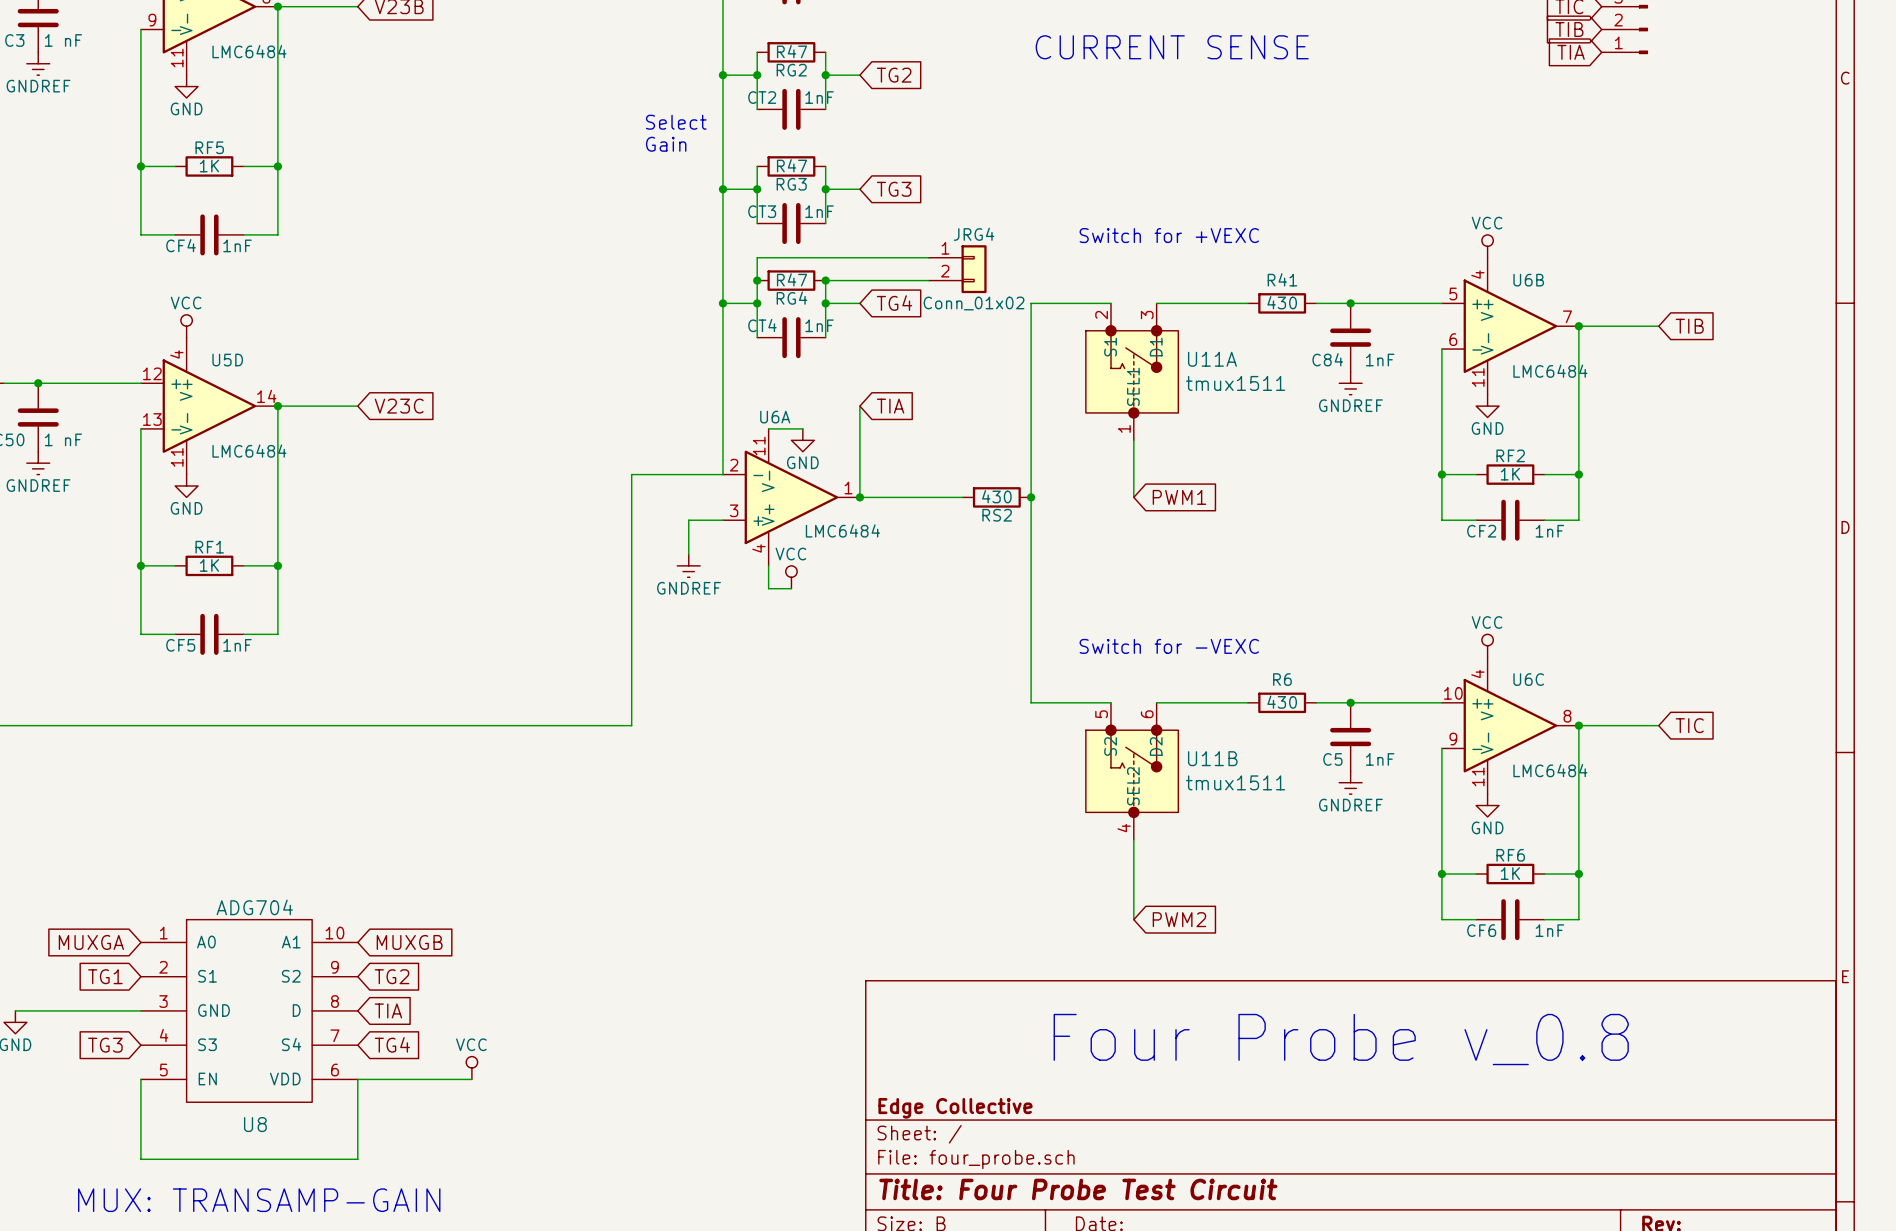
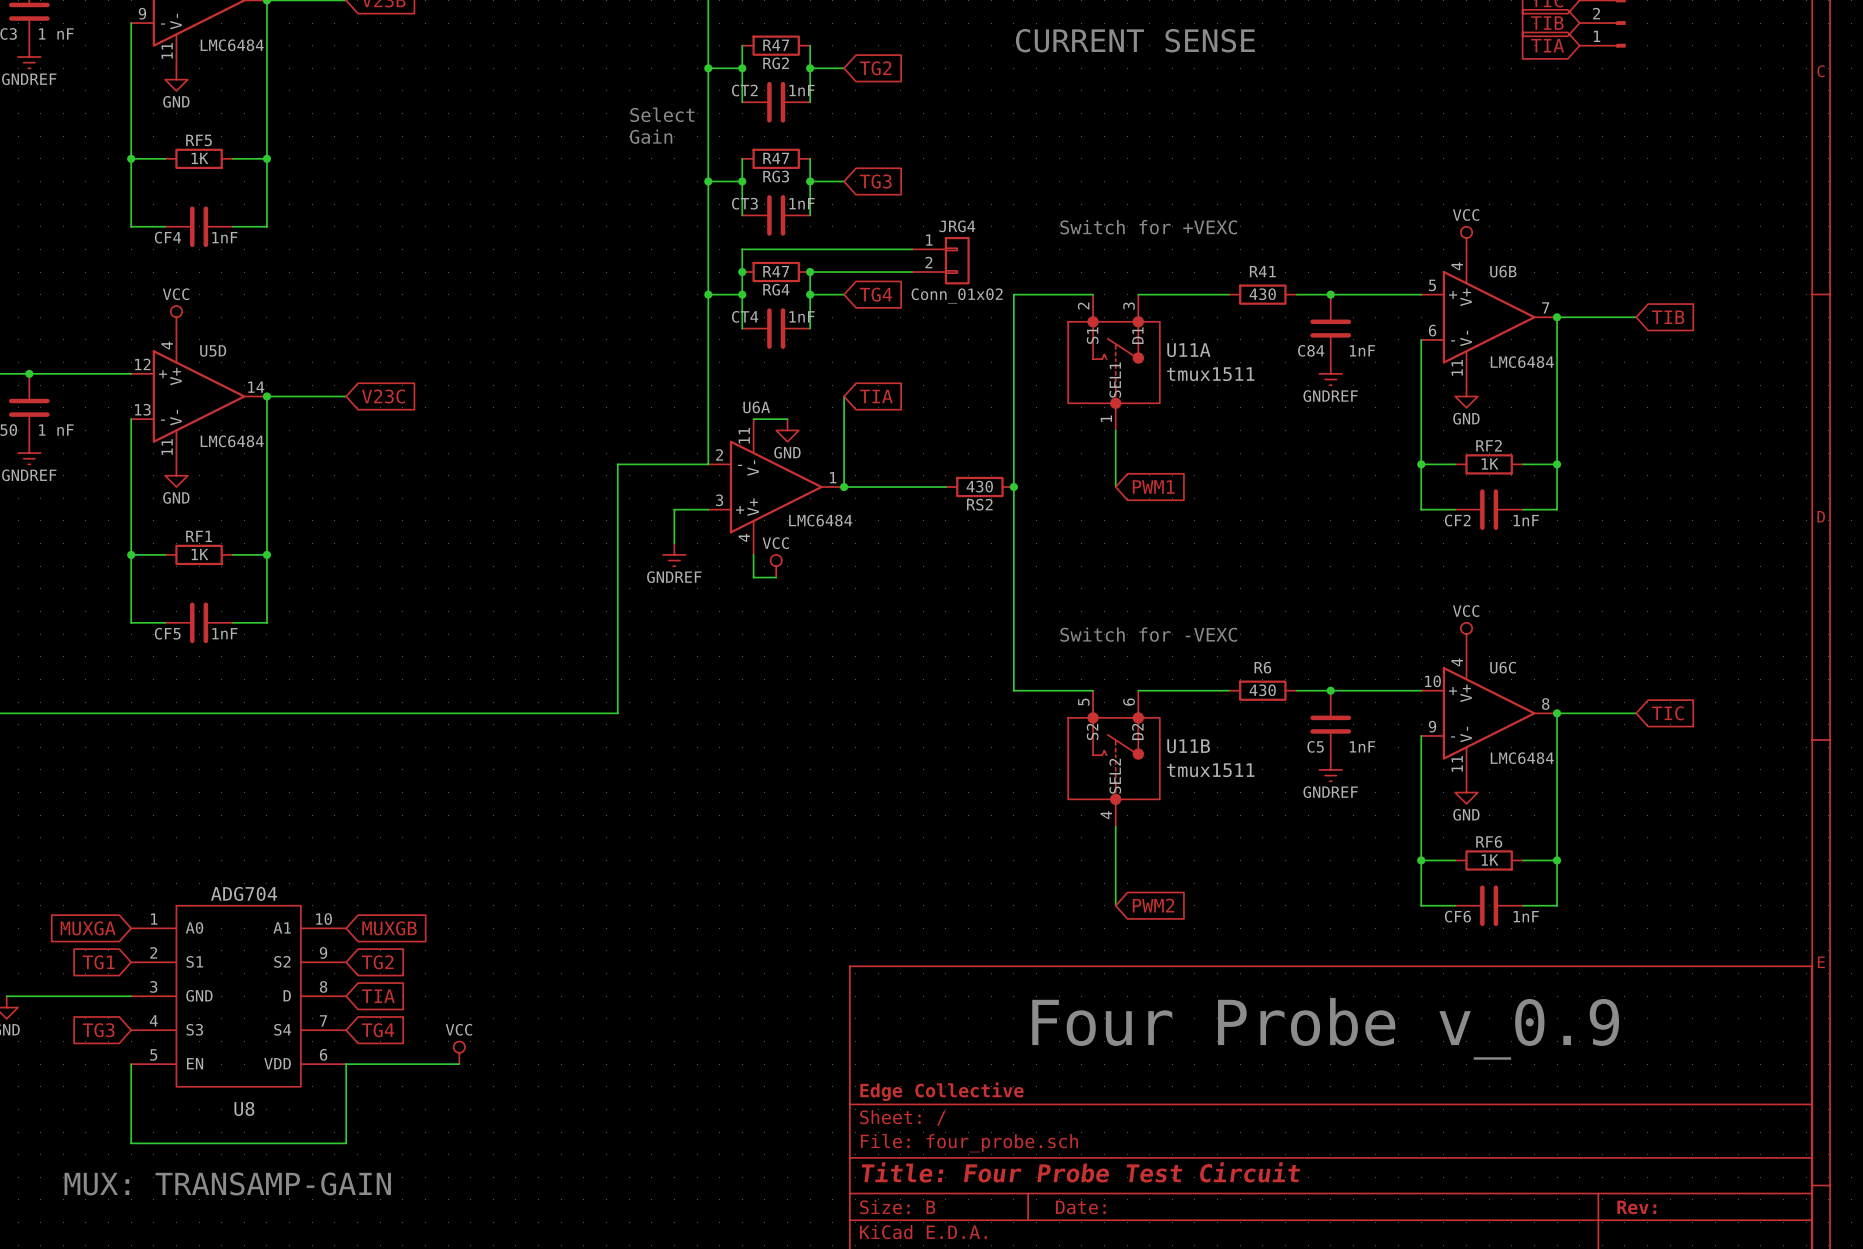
text: Four Probe v_0.8 (1341, 1039) -> Four Probe v_0.9 (1325, 1028)

